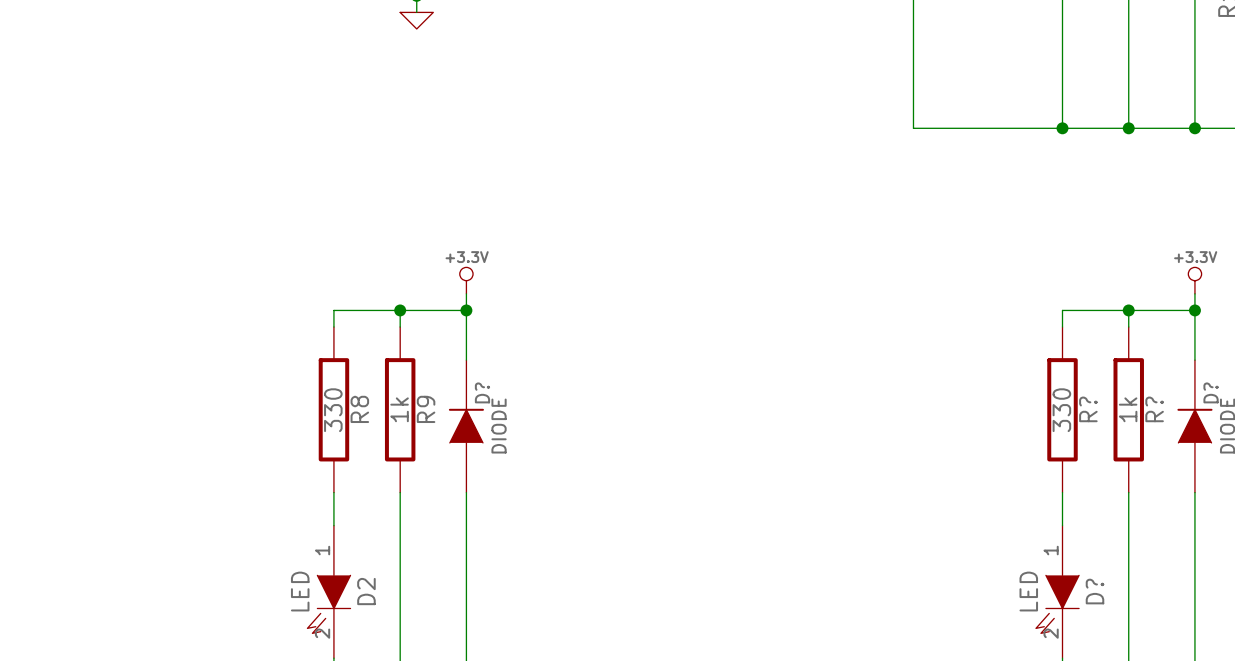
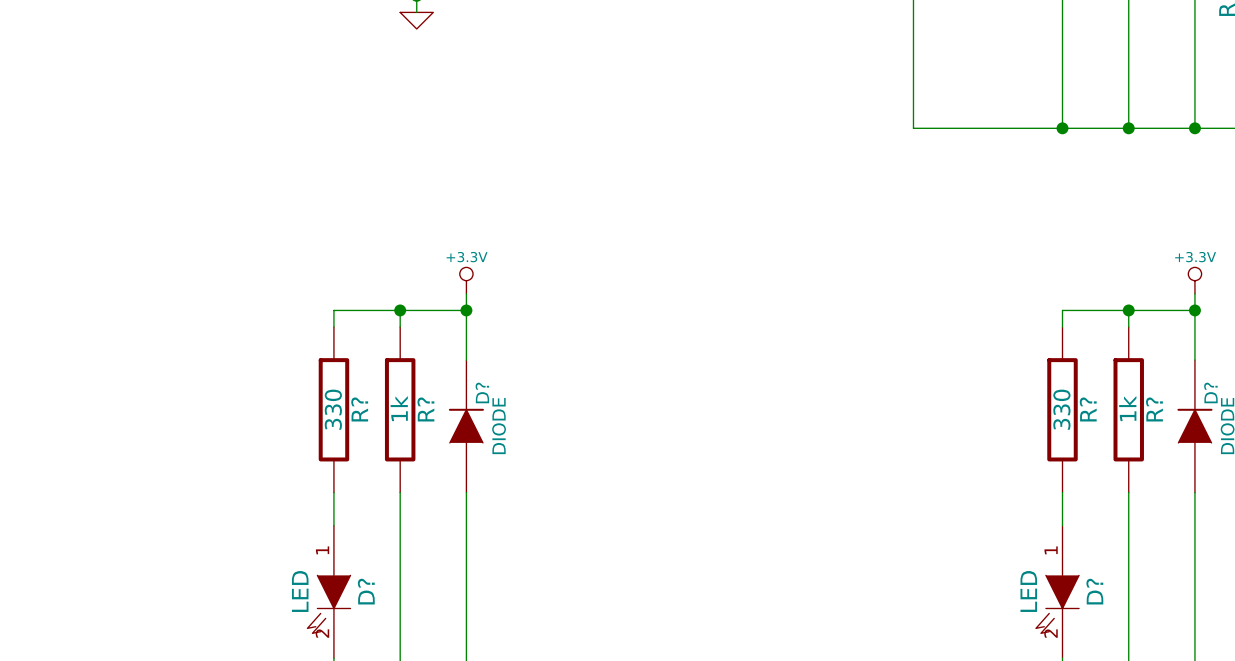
R8 name: R8 (359, 409) -> R? (359, 409)
R9 name: R9 (426, 409) -> R? (425, 409)
D2 name: D2 (366, 591) -> D? (366, 591)

